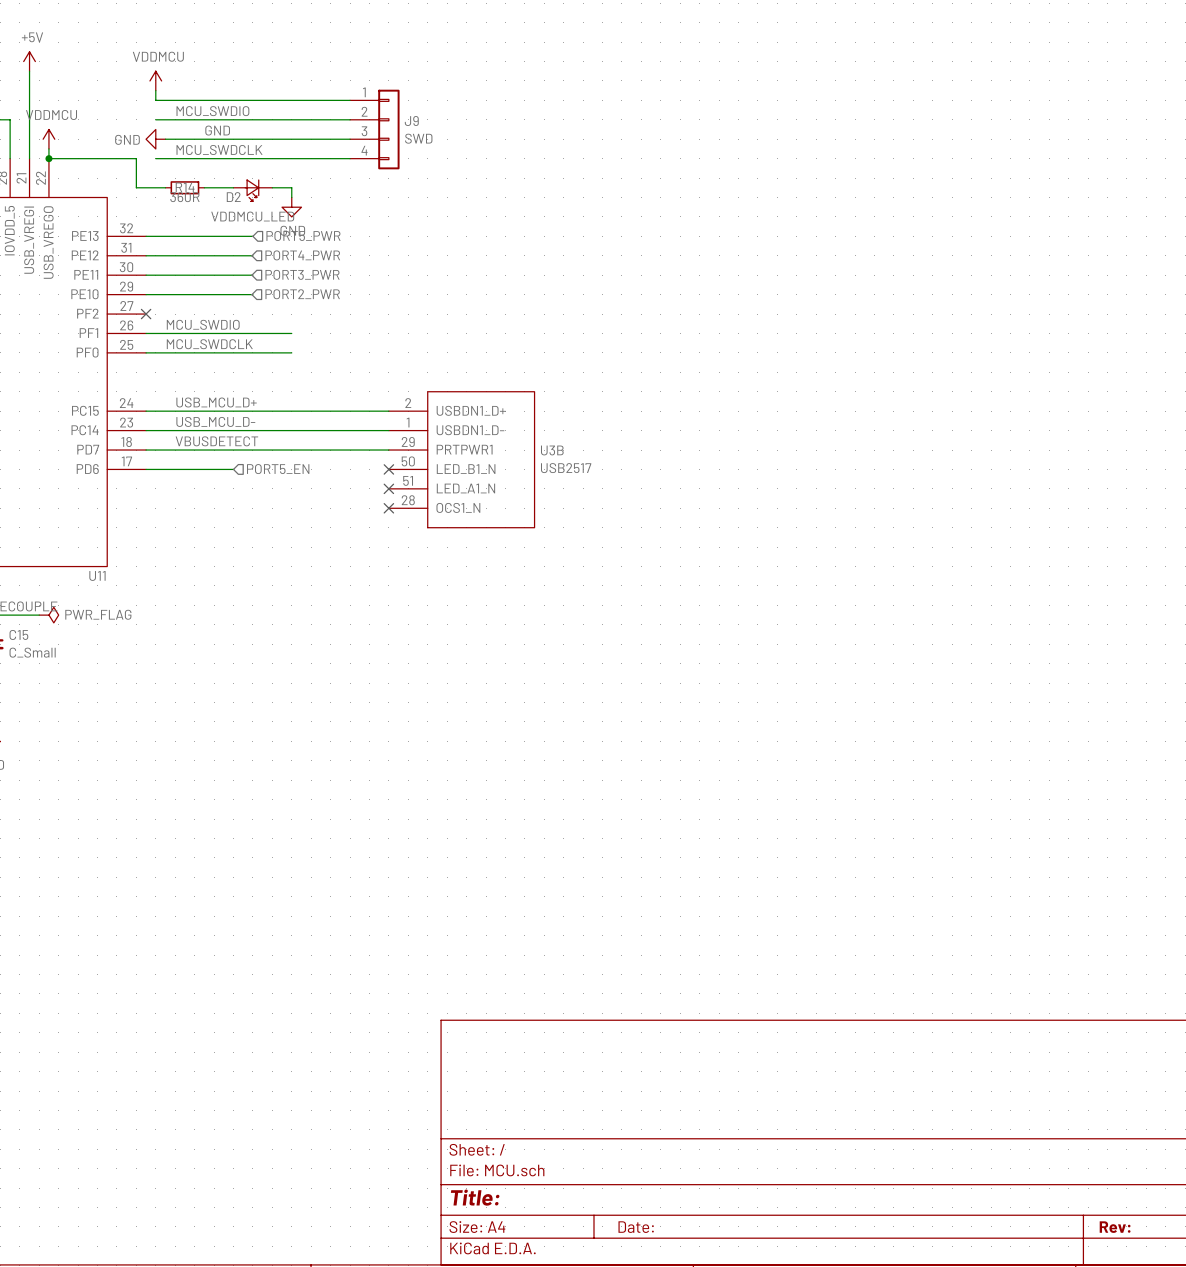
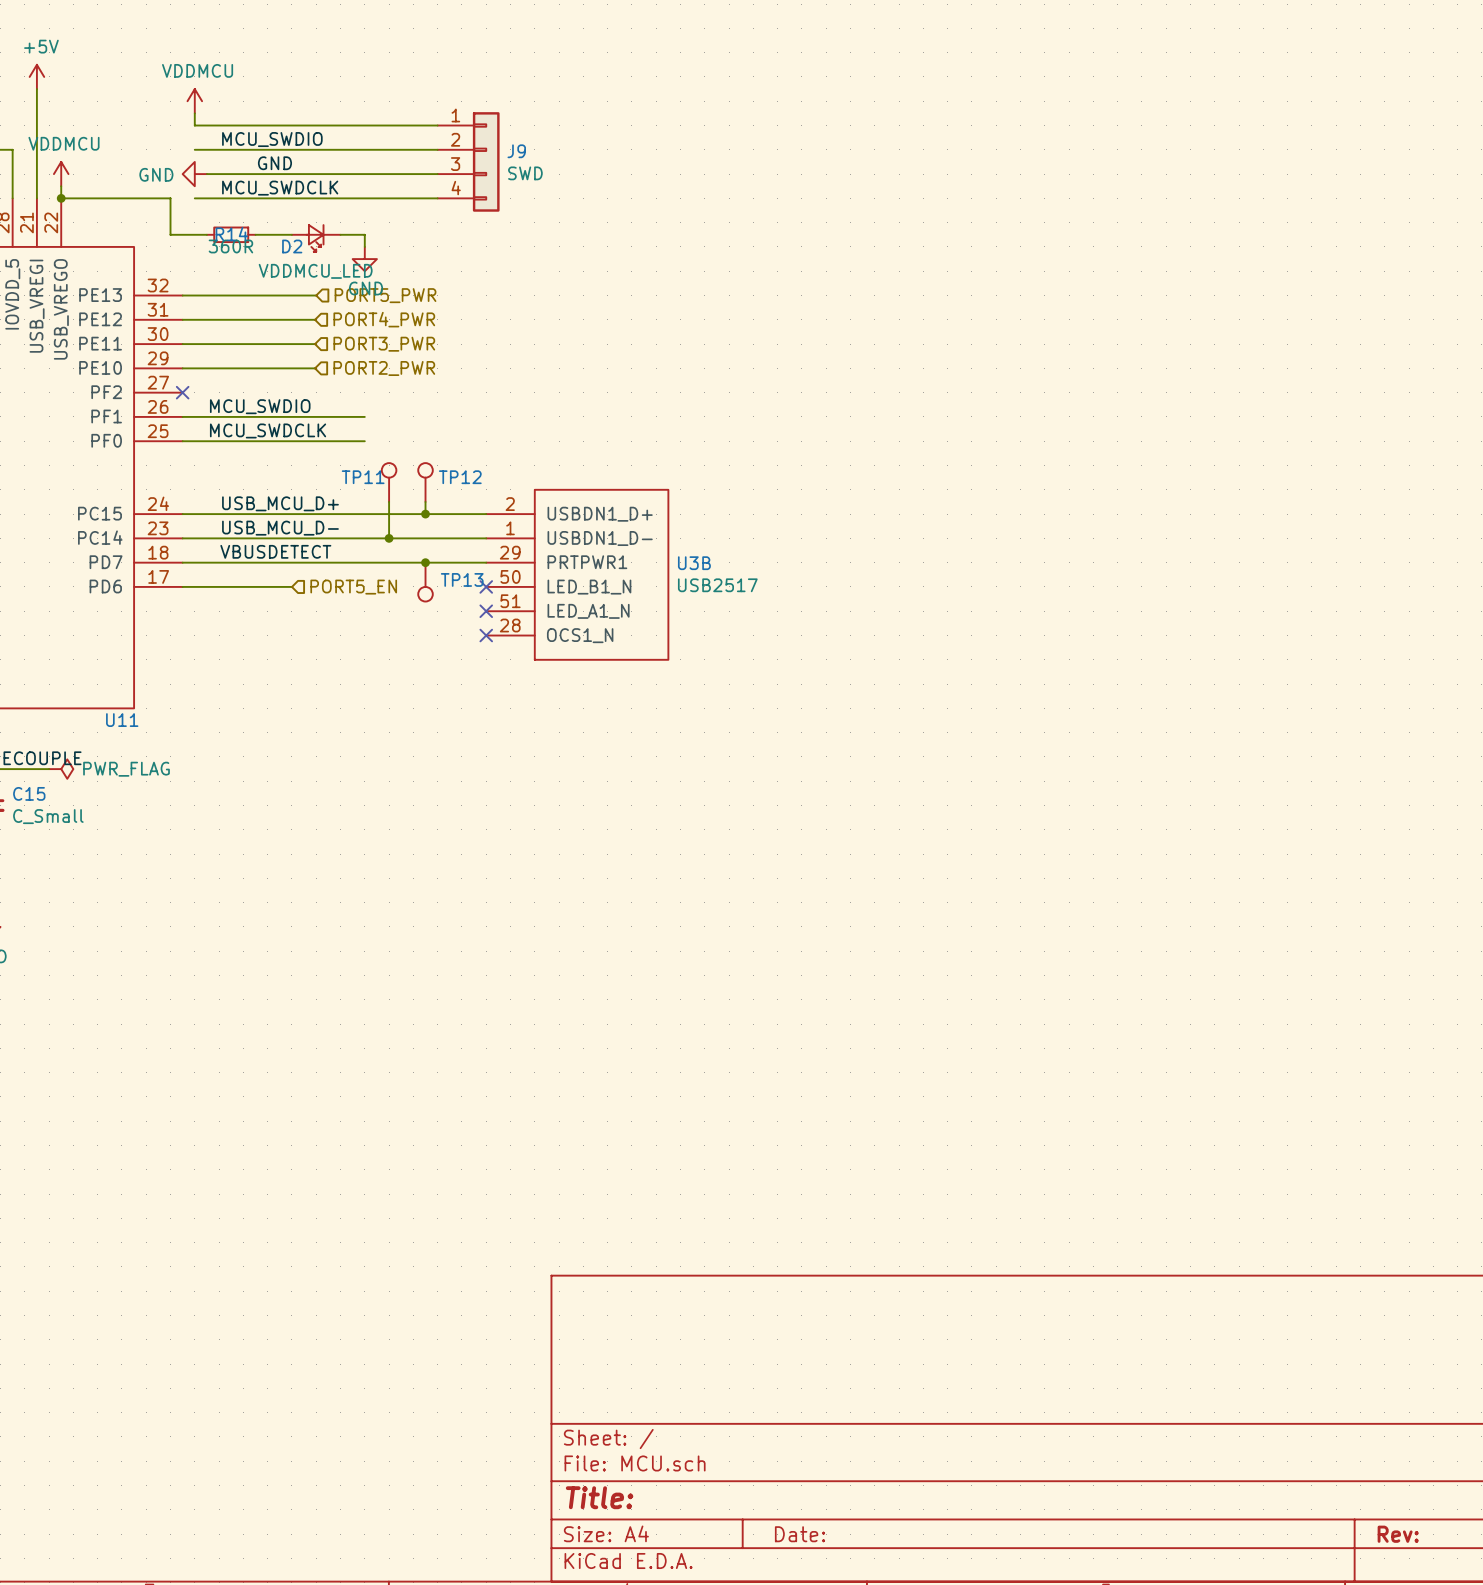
TP11: none -> (389, 482)
TP12: none -> (425, 482)
wire: none -> (389, 501) (389, 538)
wire: none -> (425, 501) (425, 514)
junction: none -> (425, 514)
junction: none -> (389, 538)
junction: none -> (425, 562)
TP13: none -> (425, 582)

